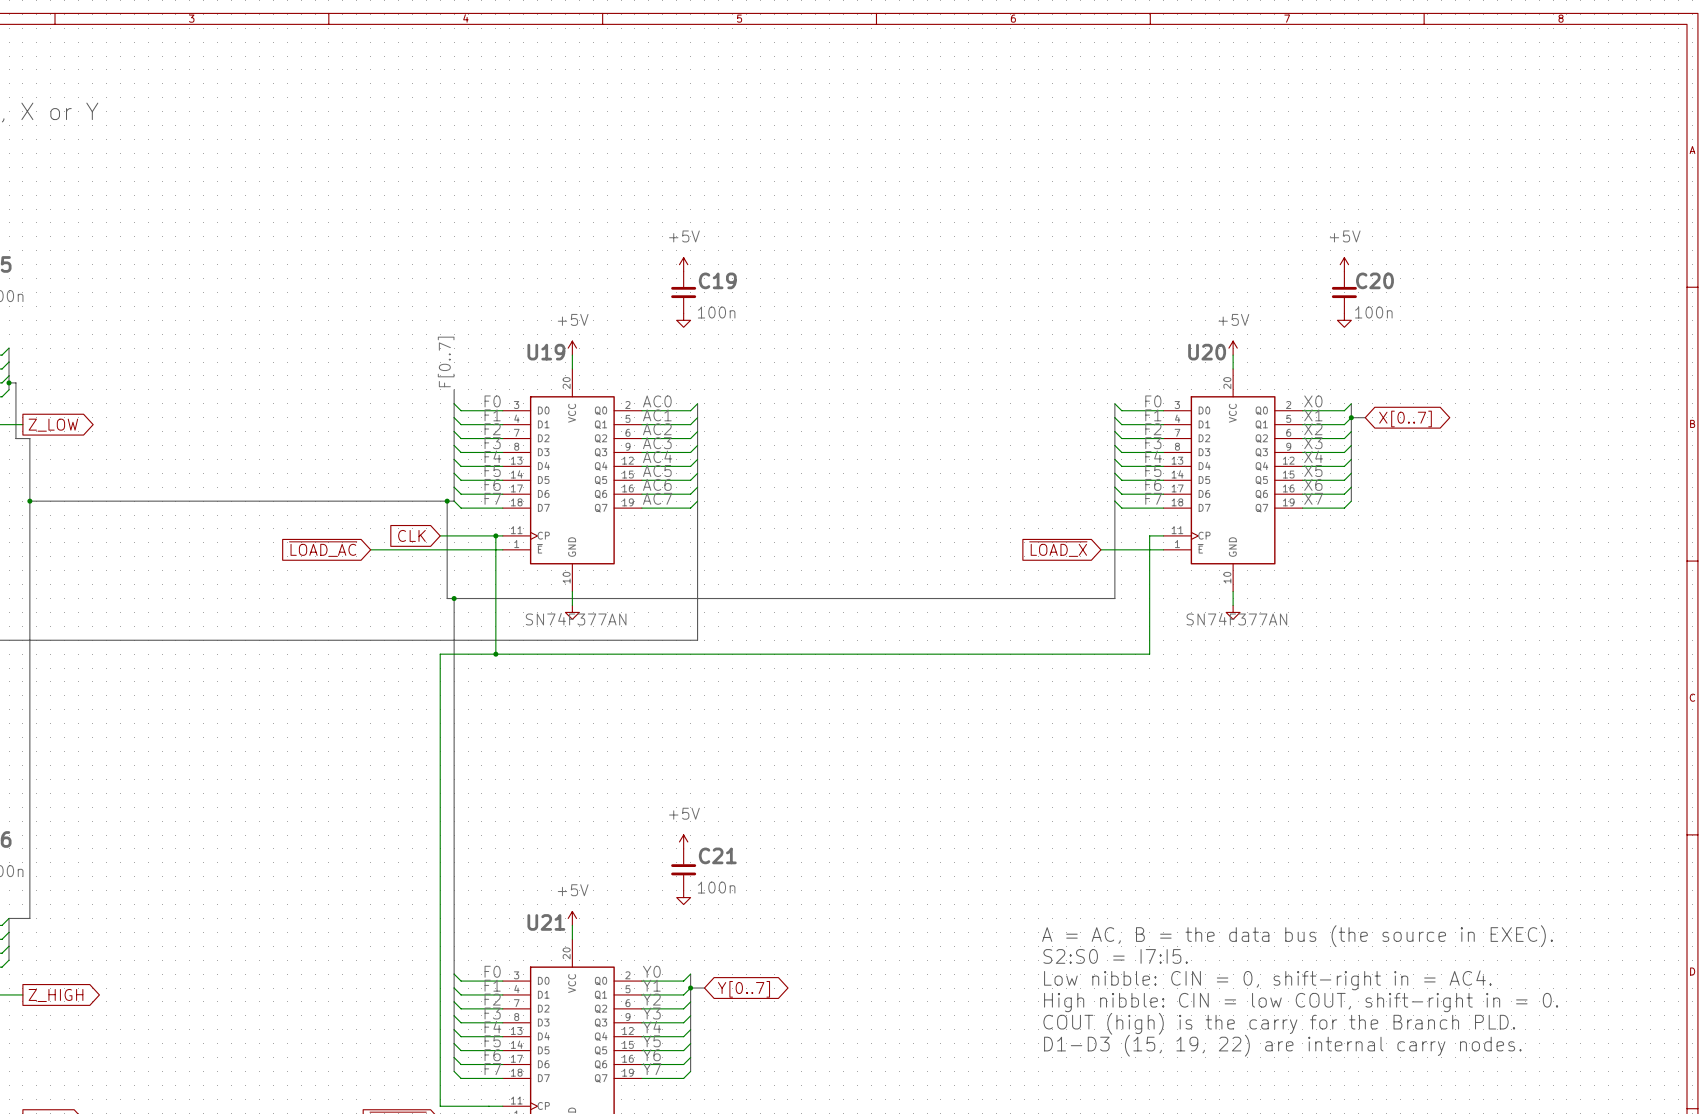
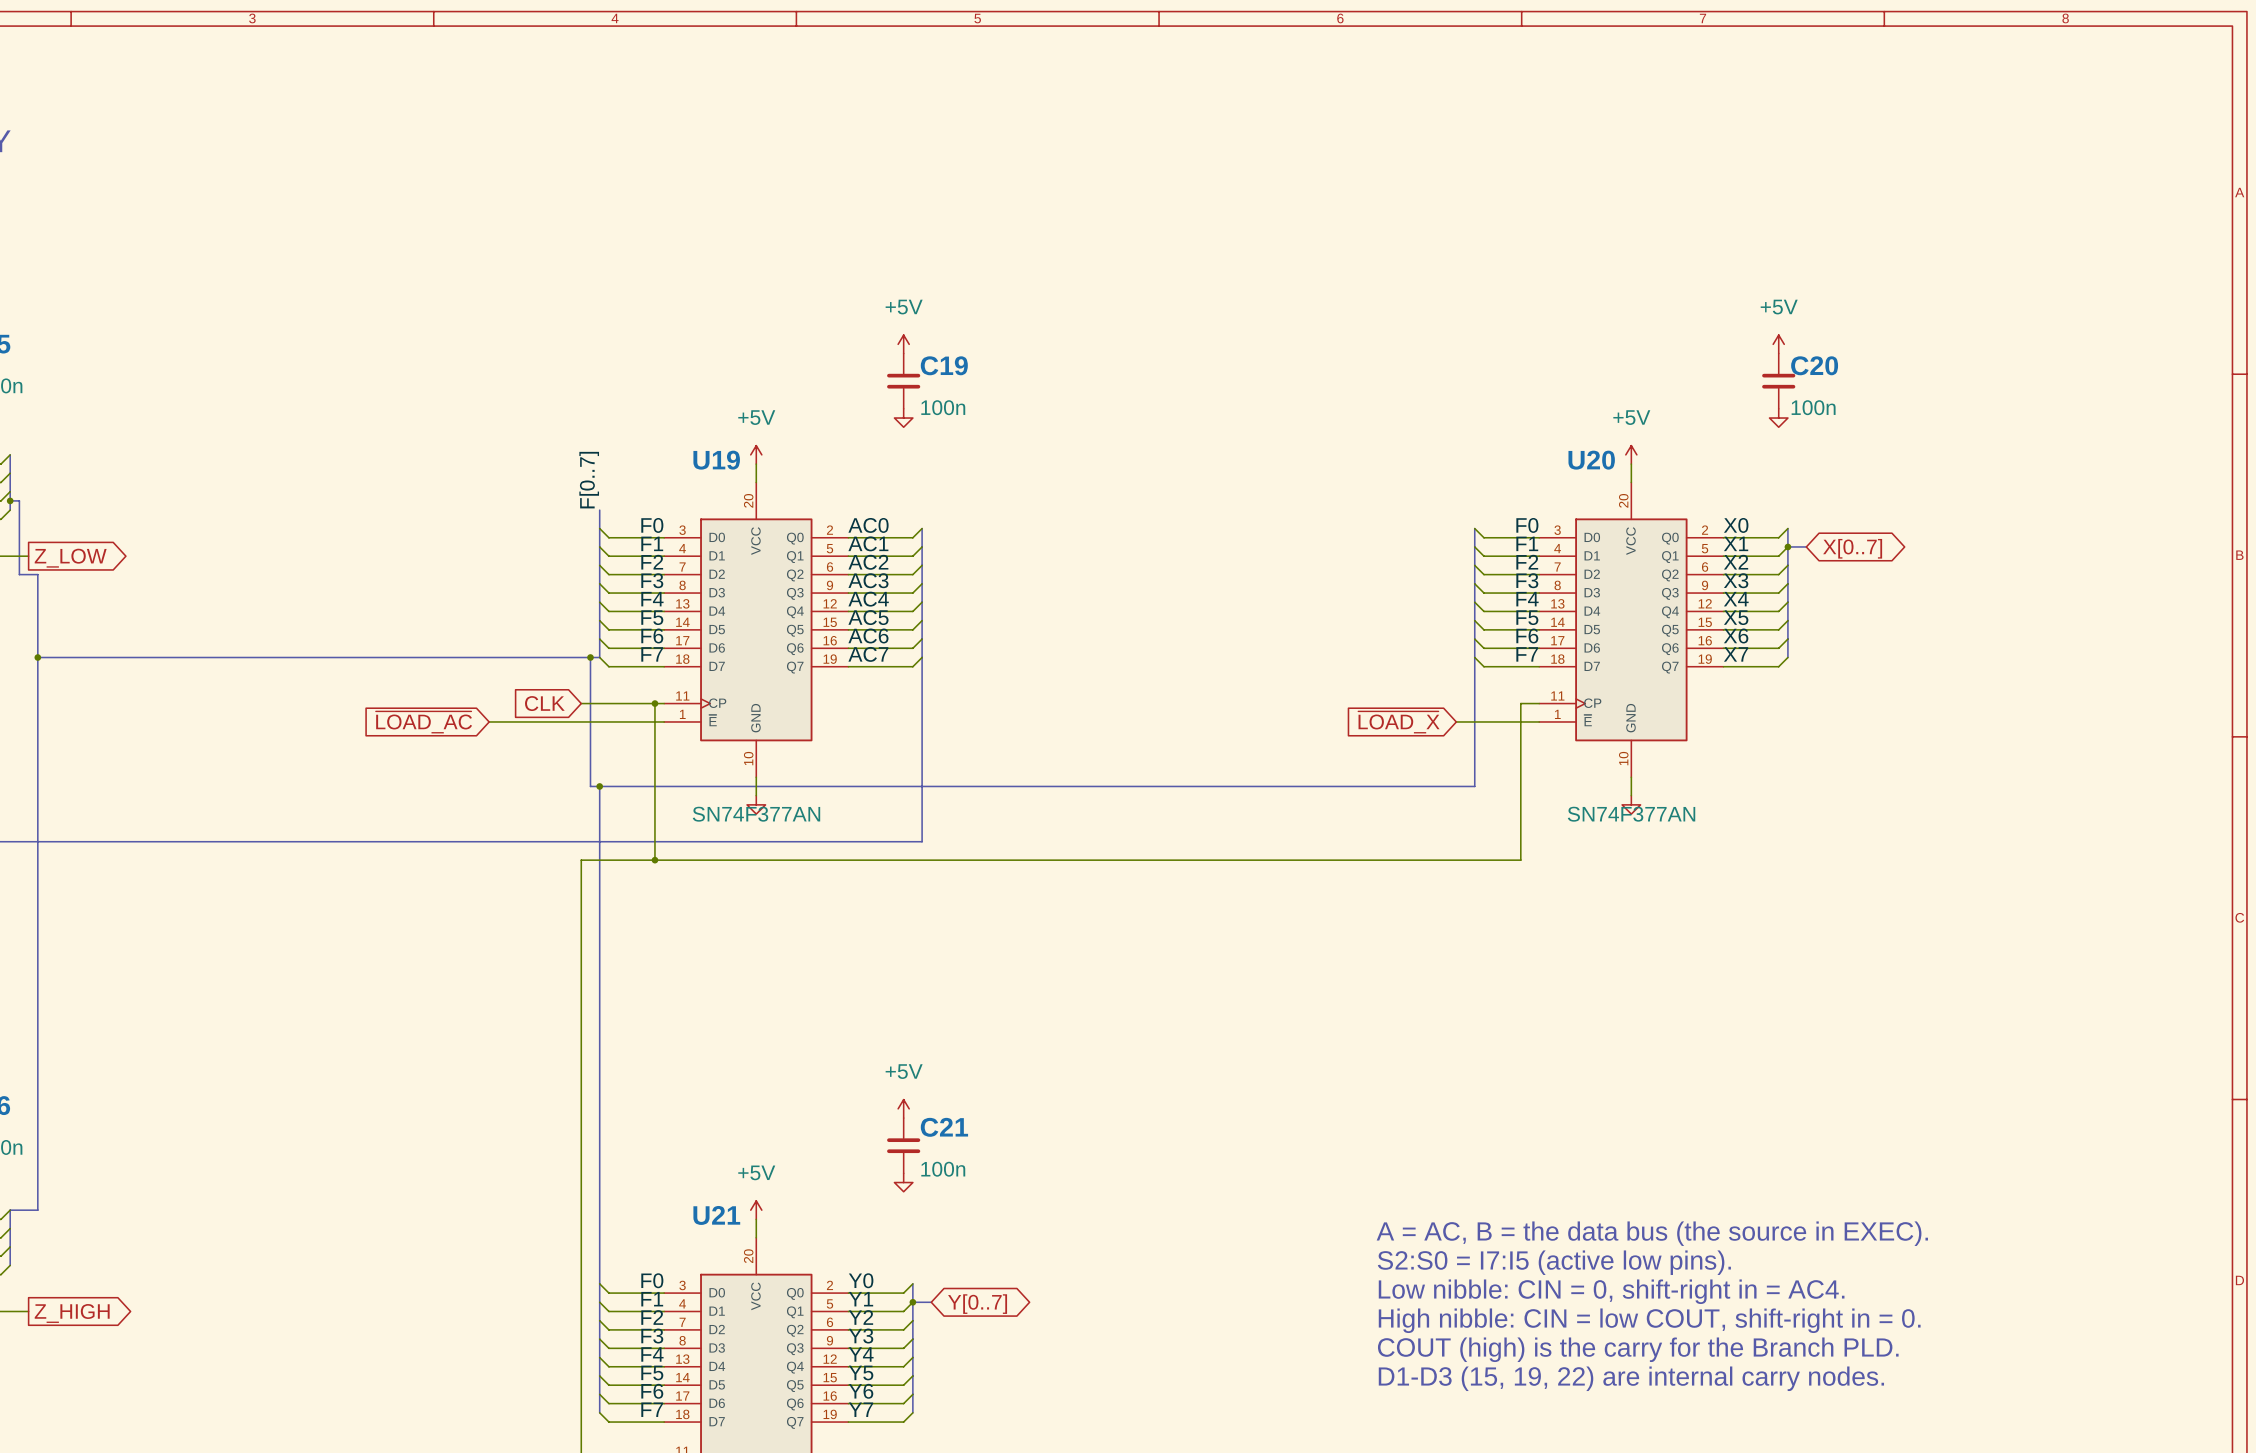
text: S2:S0 = I7:I5. (1115, 956) -> S2:S0 = I7:I5 (active low pins). (1554, 1262)

